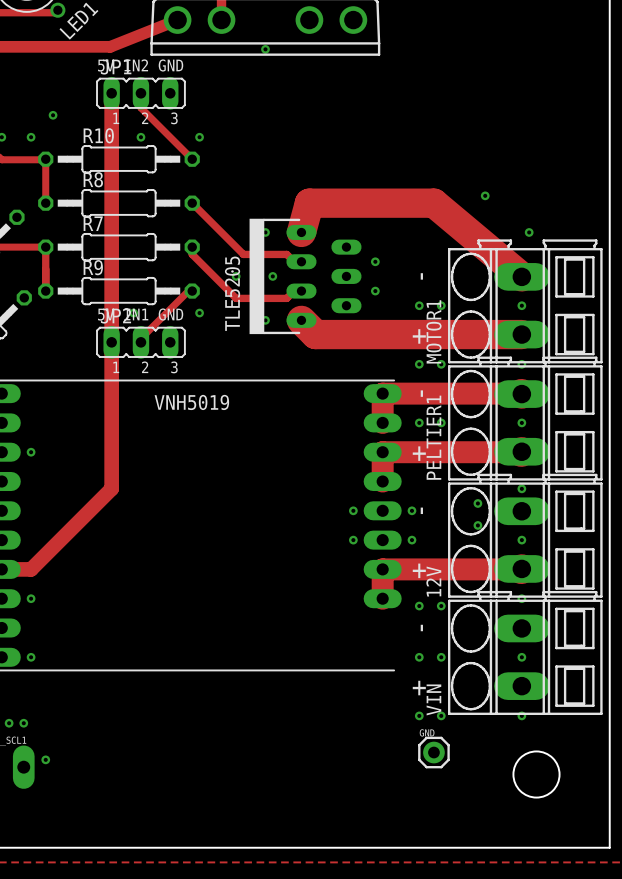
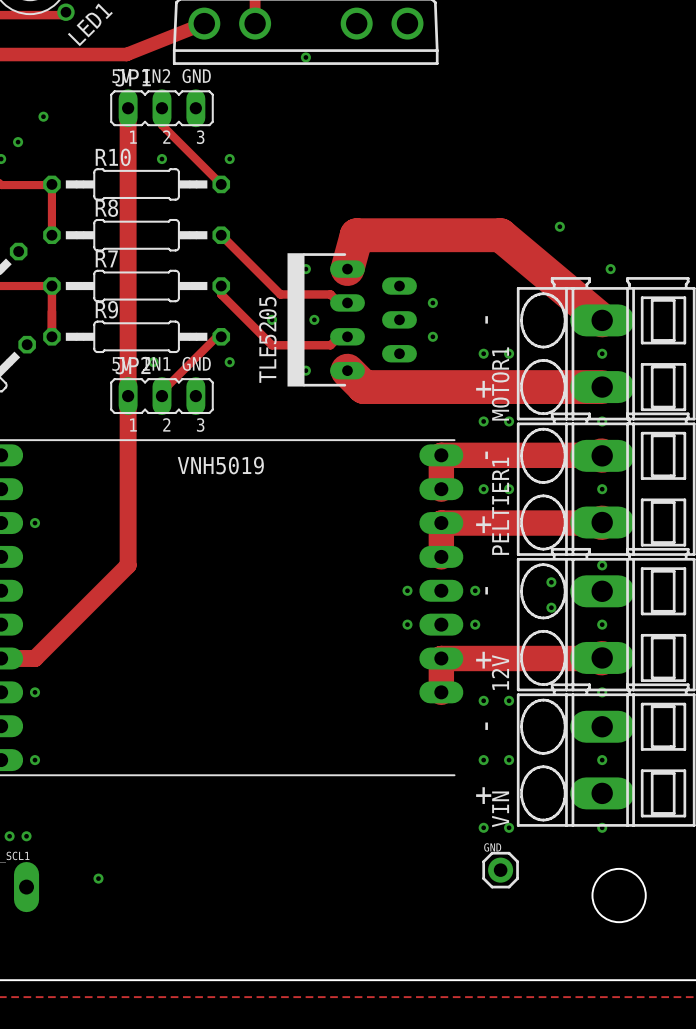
via: none -> (43, 116)
via: (53, 115) -> none
via: none -> (18, 142)
via: (31, 137) -> none
via position: (45, 759) -> (98, 878)

